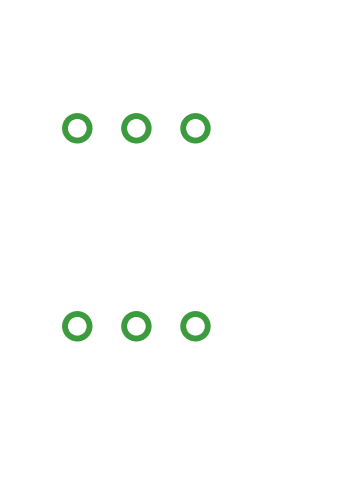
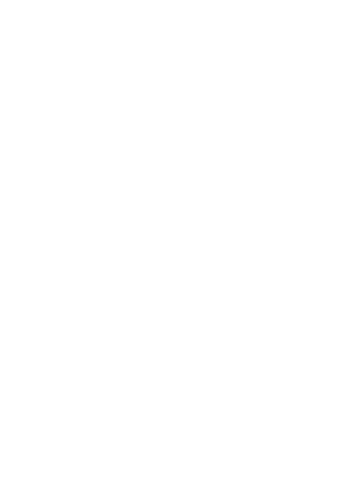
part: (136, 128) -> none
part: (136, 326) -> none

